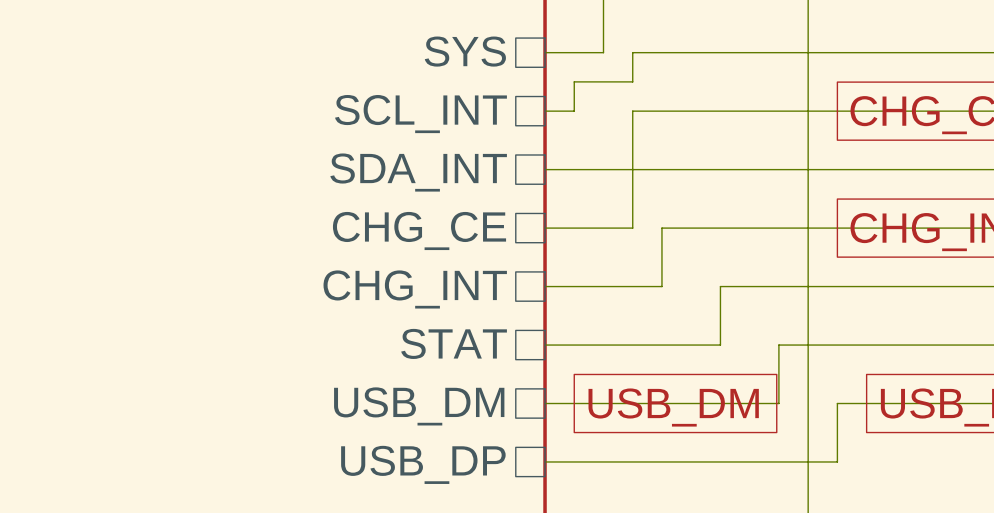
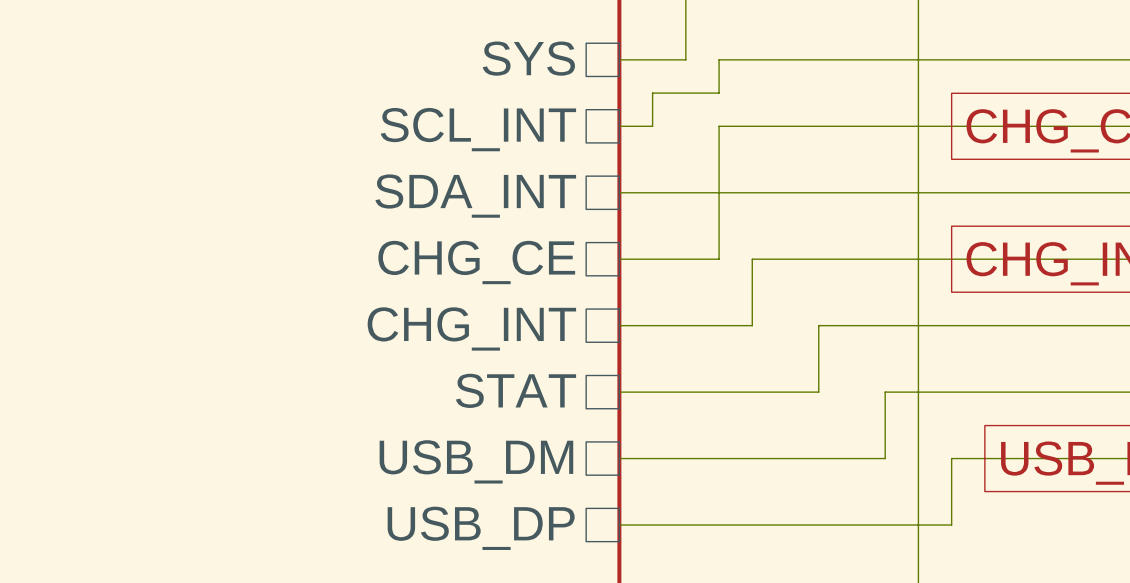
global label: USB_DM (673, 407) -> none

